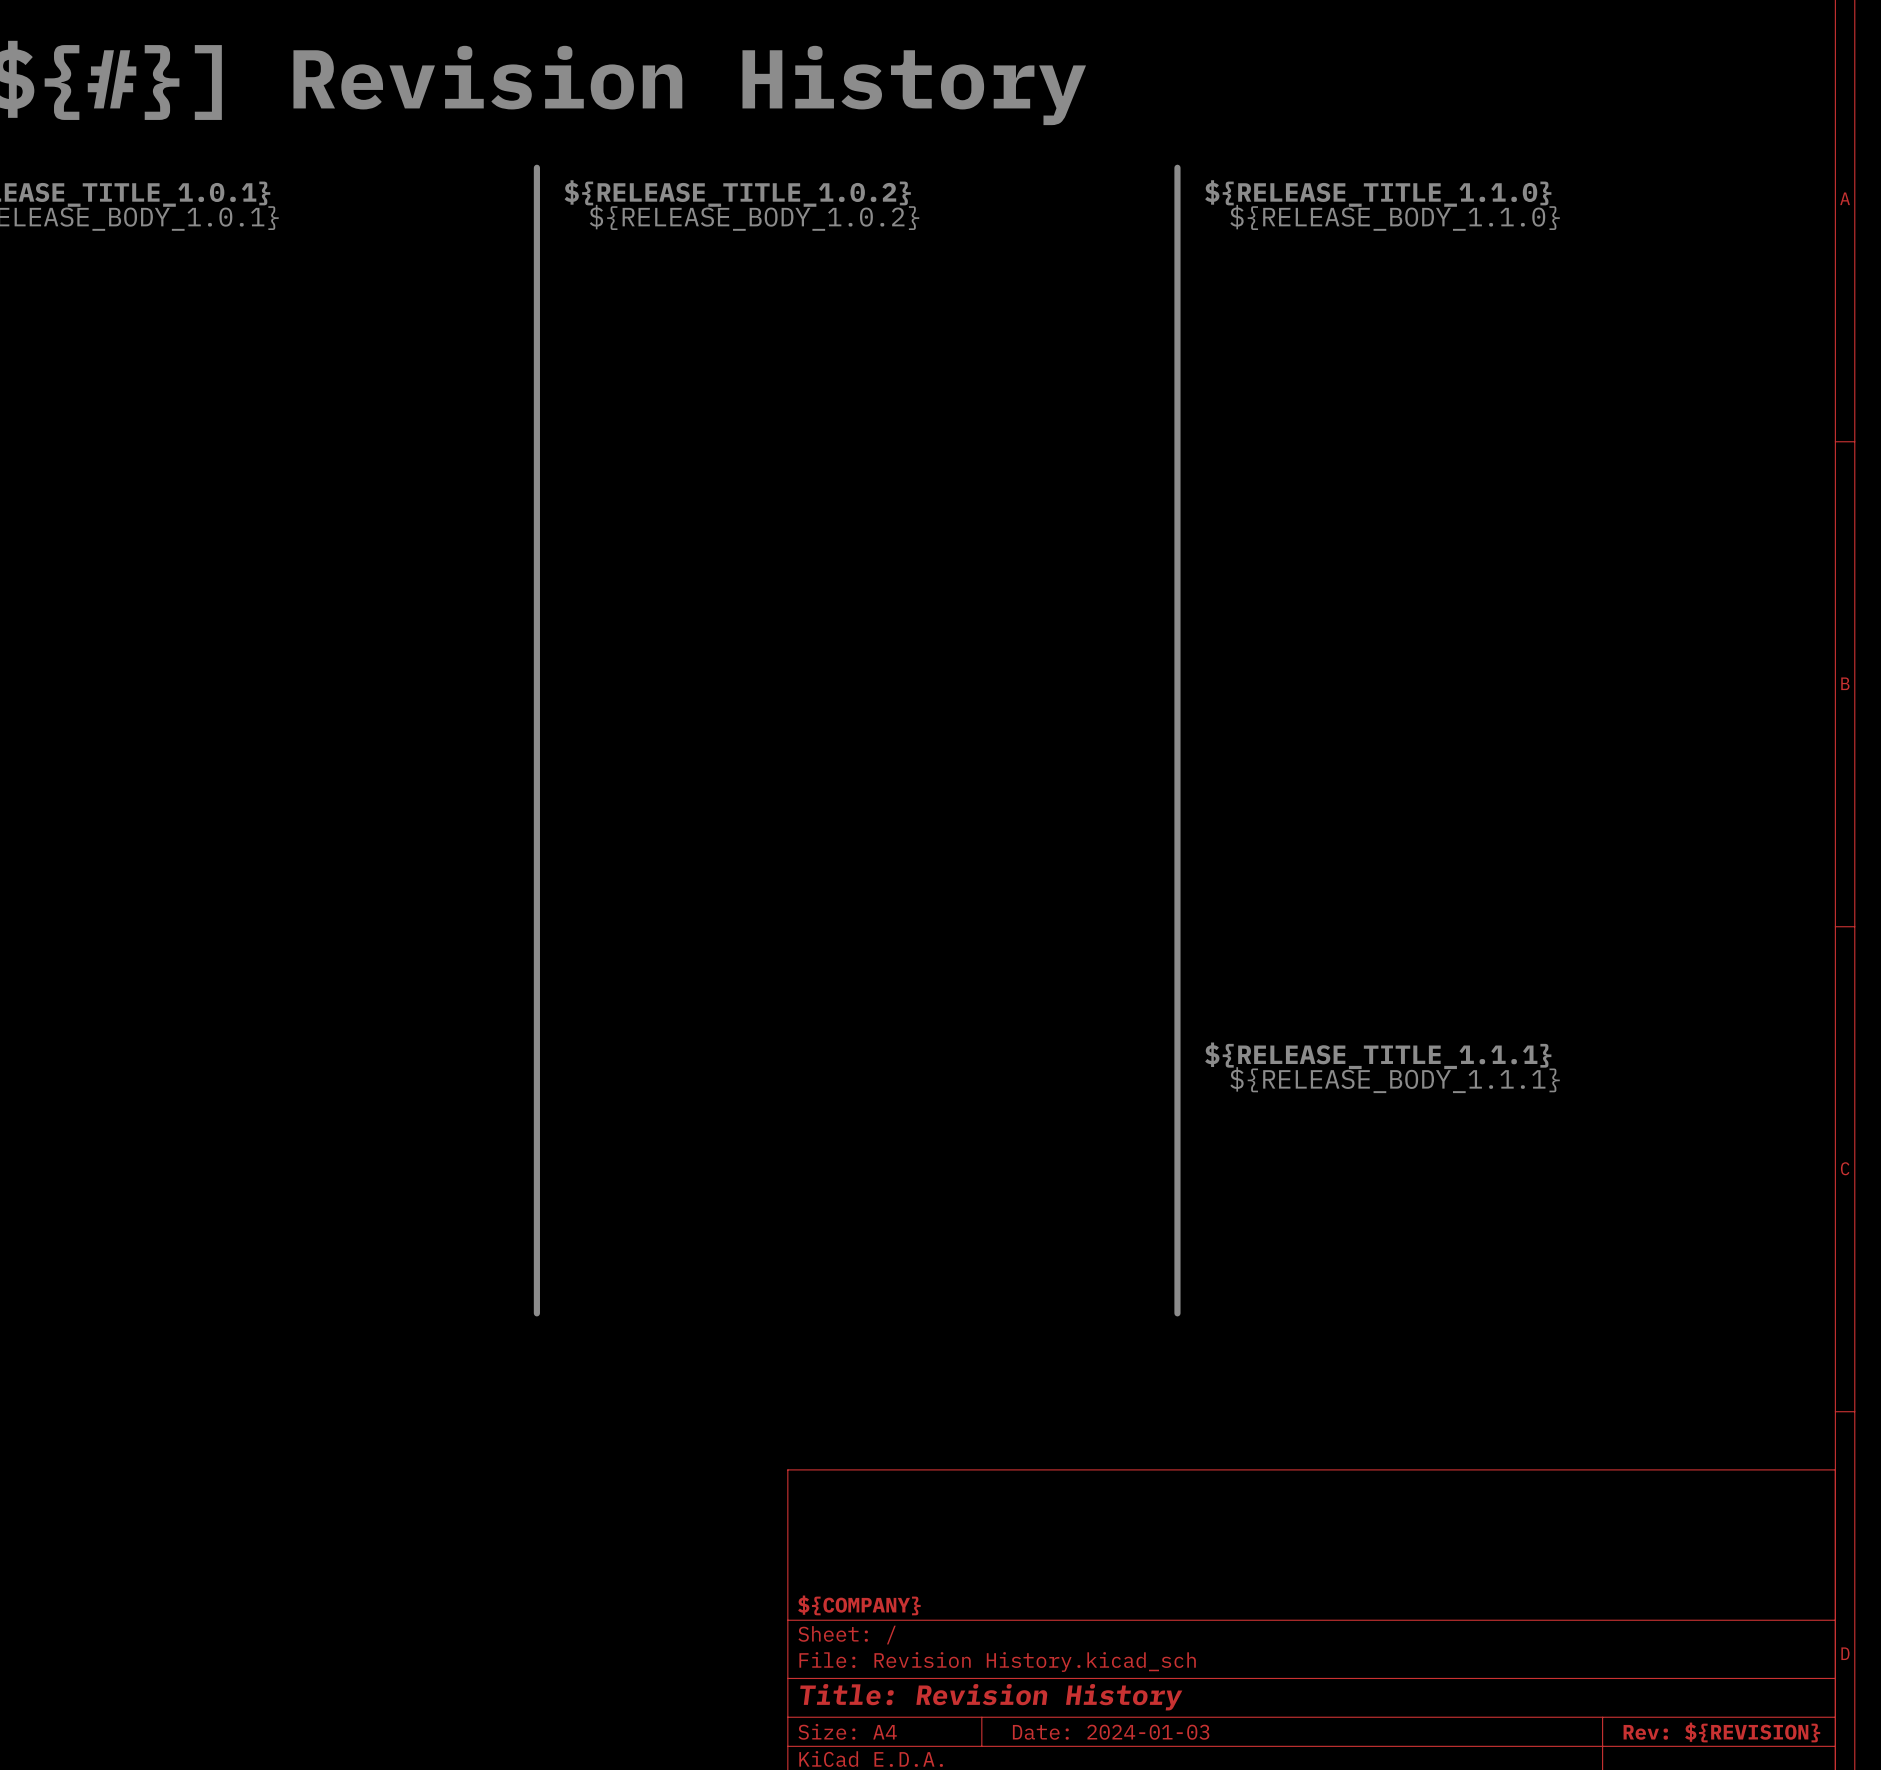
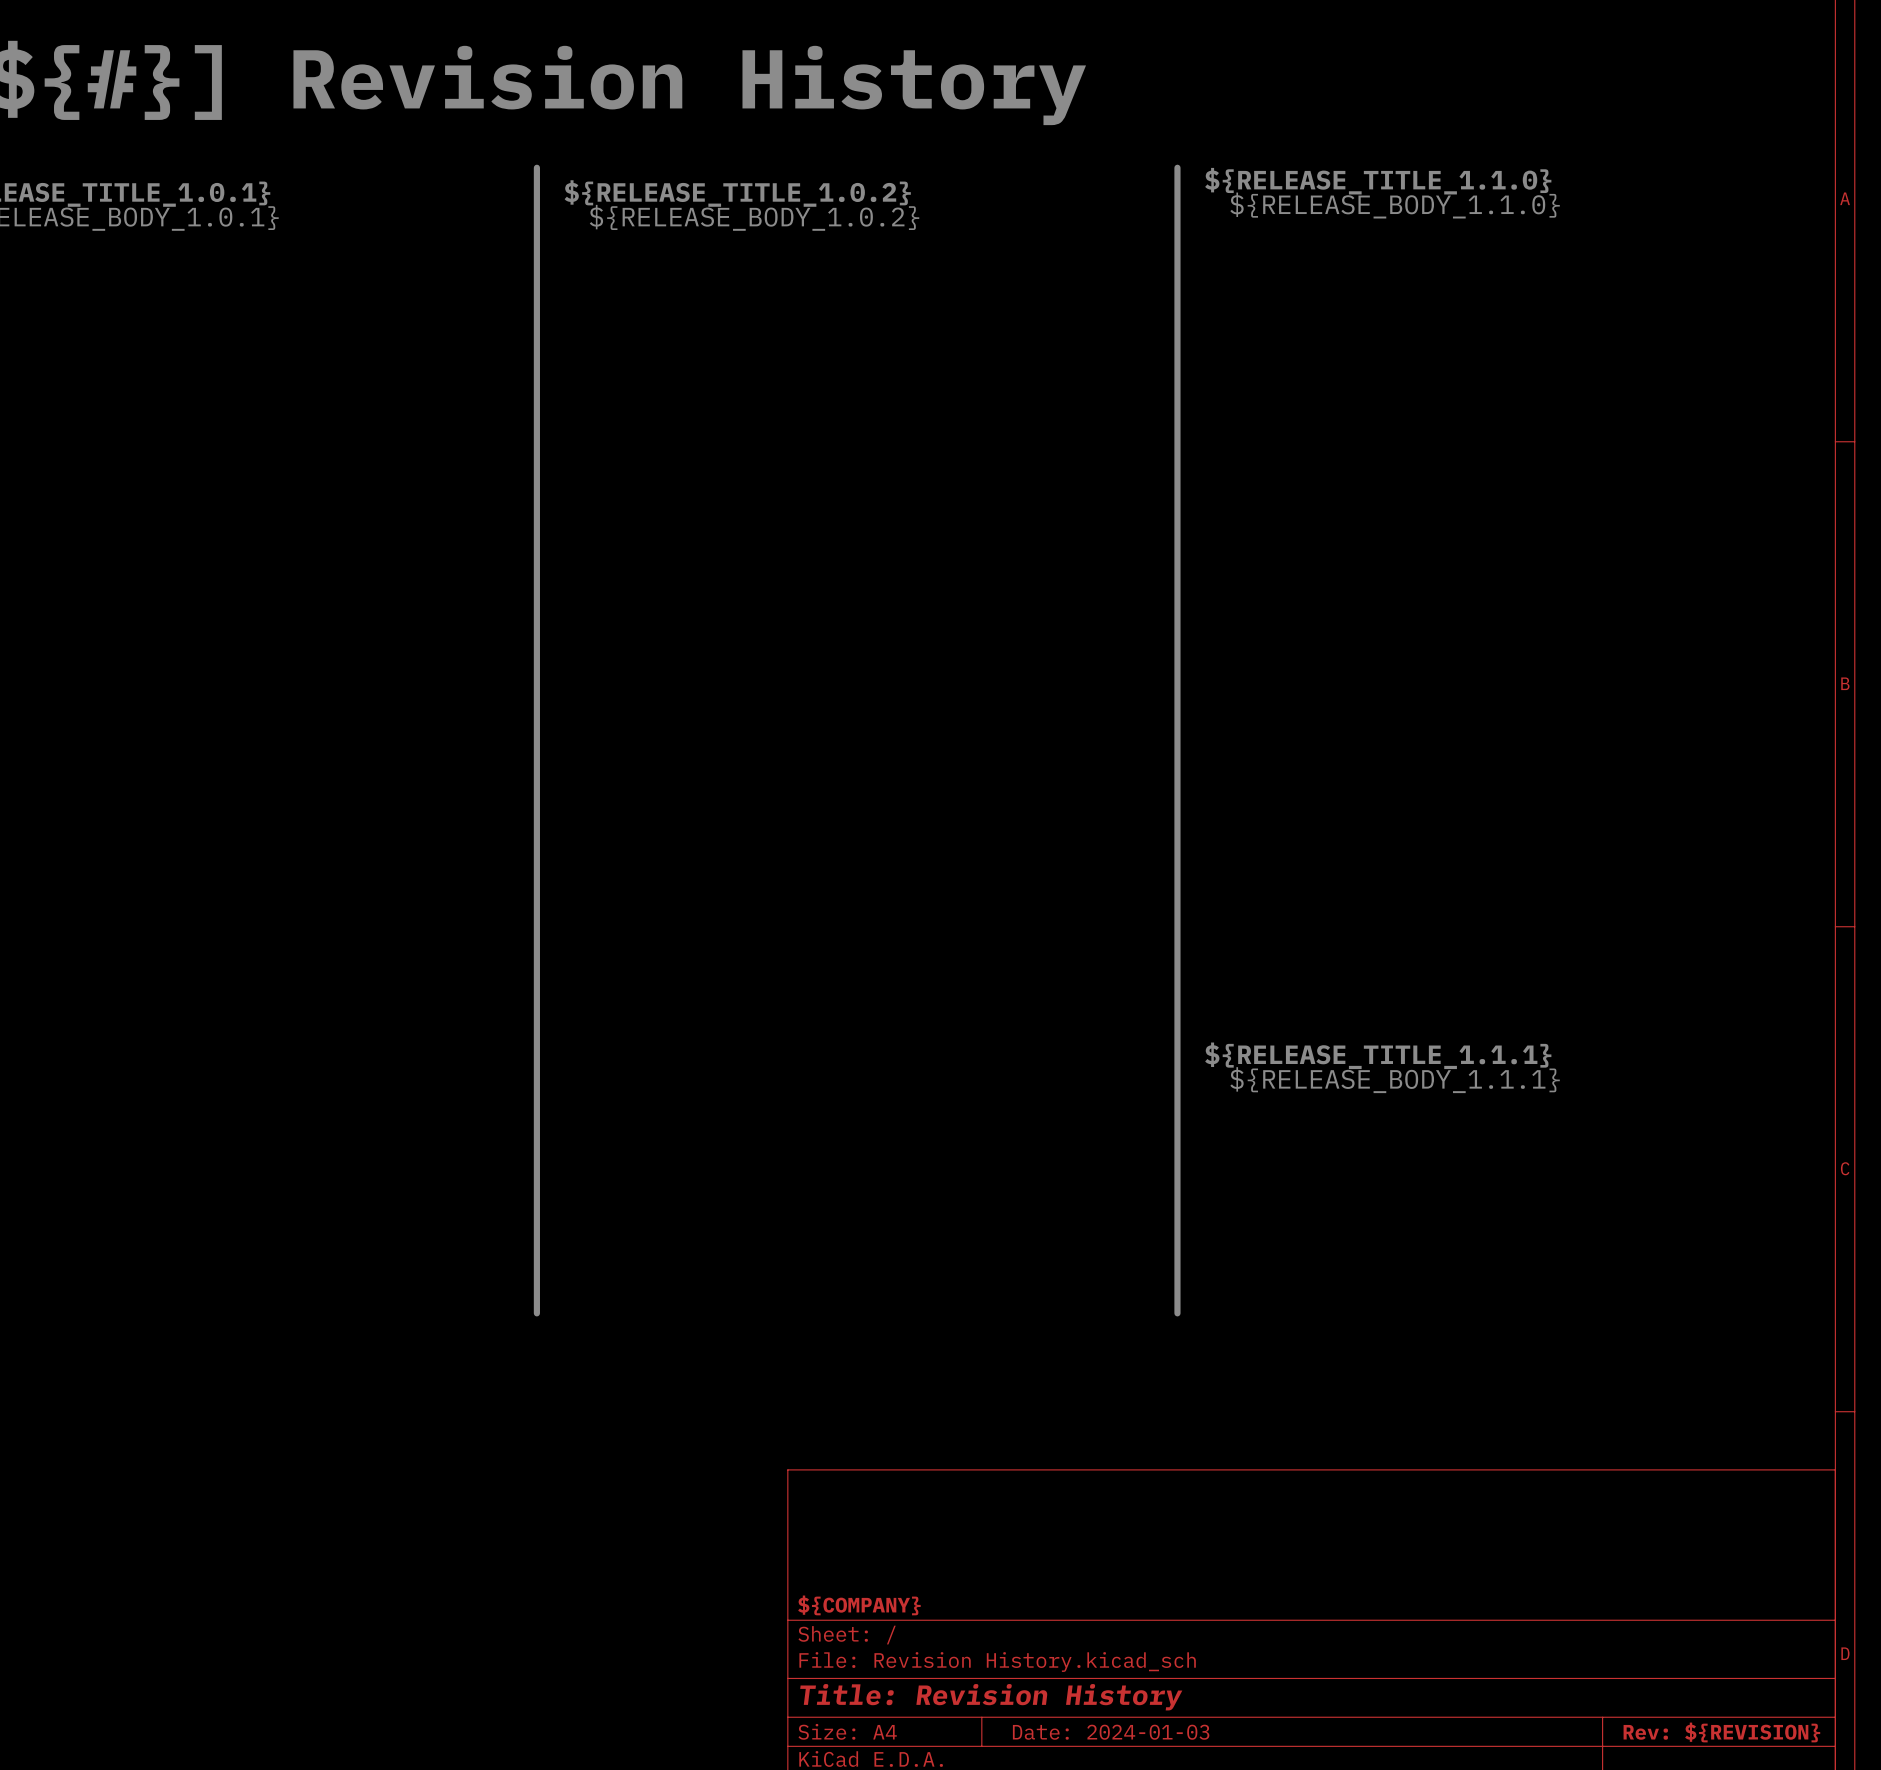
text position: ${RELEASE_TITLE_1.1.0} (1378, 193) -> ${RELEASE_TITLE_1.1.0} (1378, 181)
text position: ${RELEASE_BODY_1.1.0} (1395, 217) -> ${RELEASE_BODY_1.1.0} (1395, 205)

